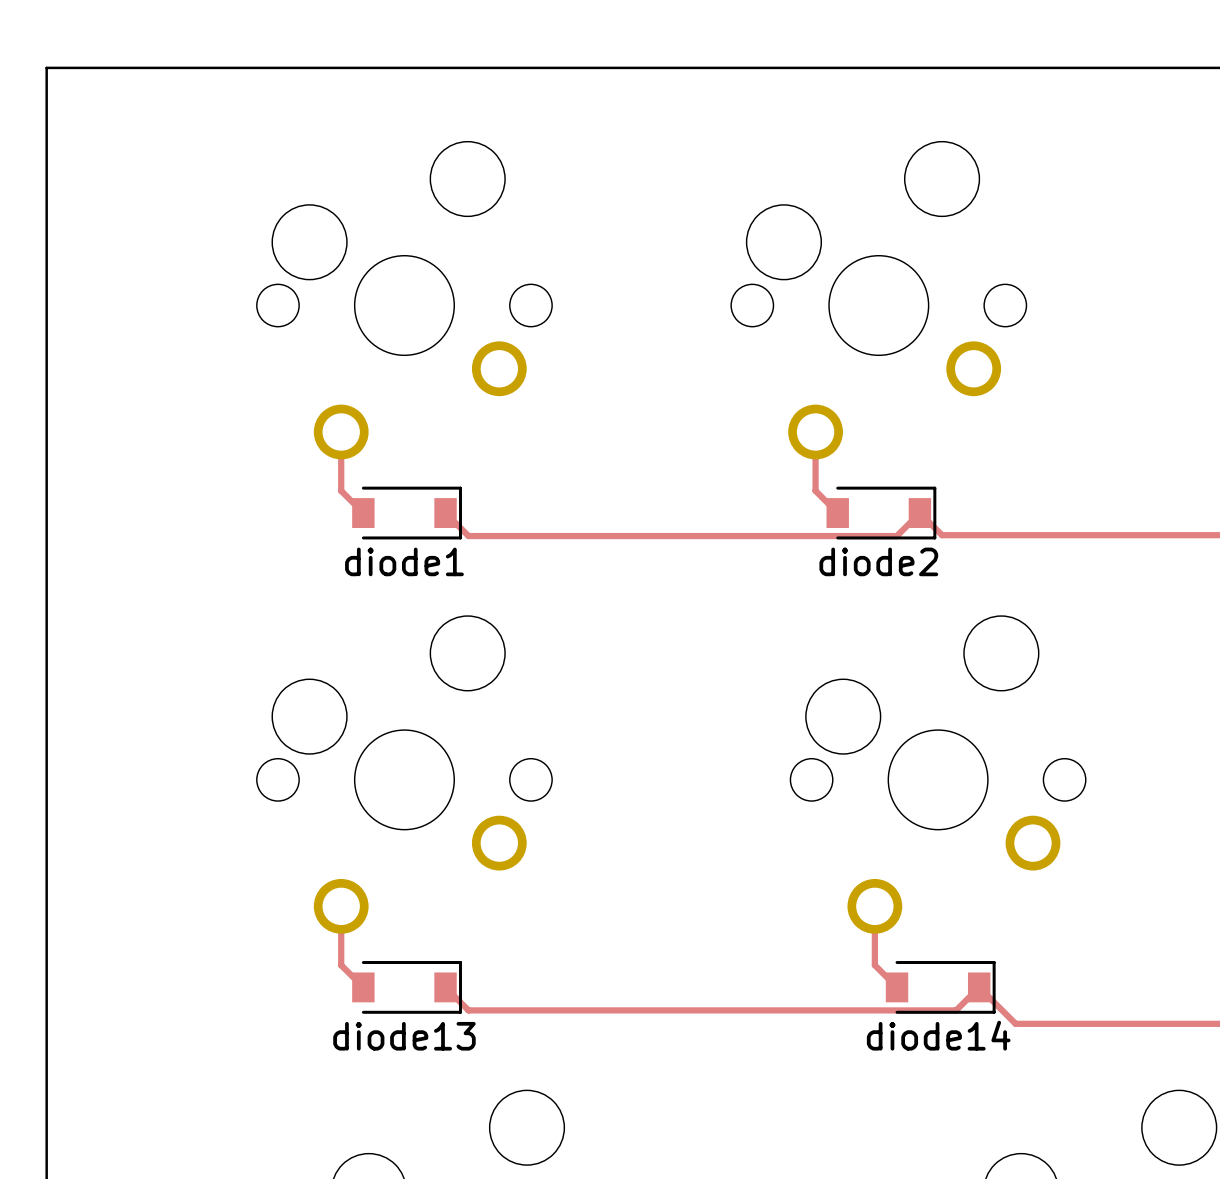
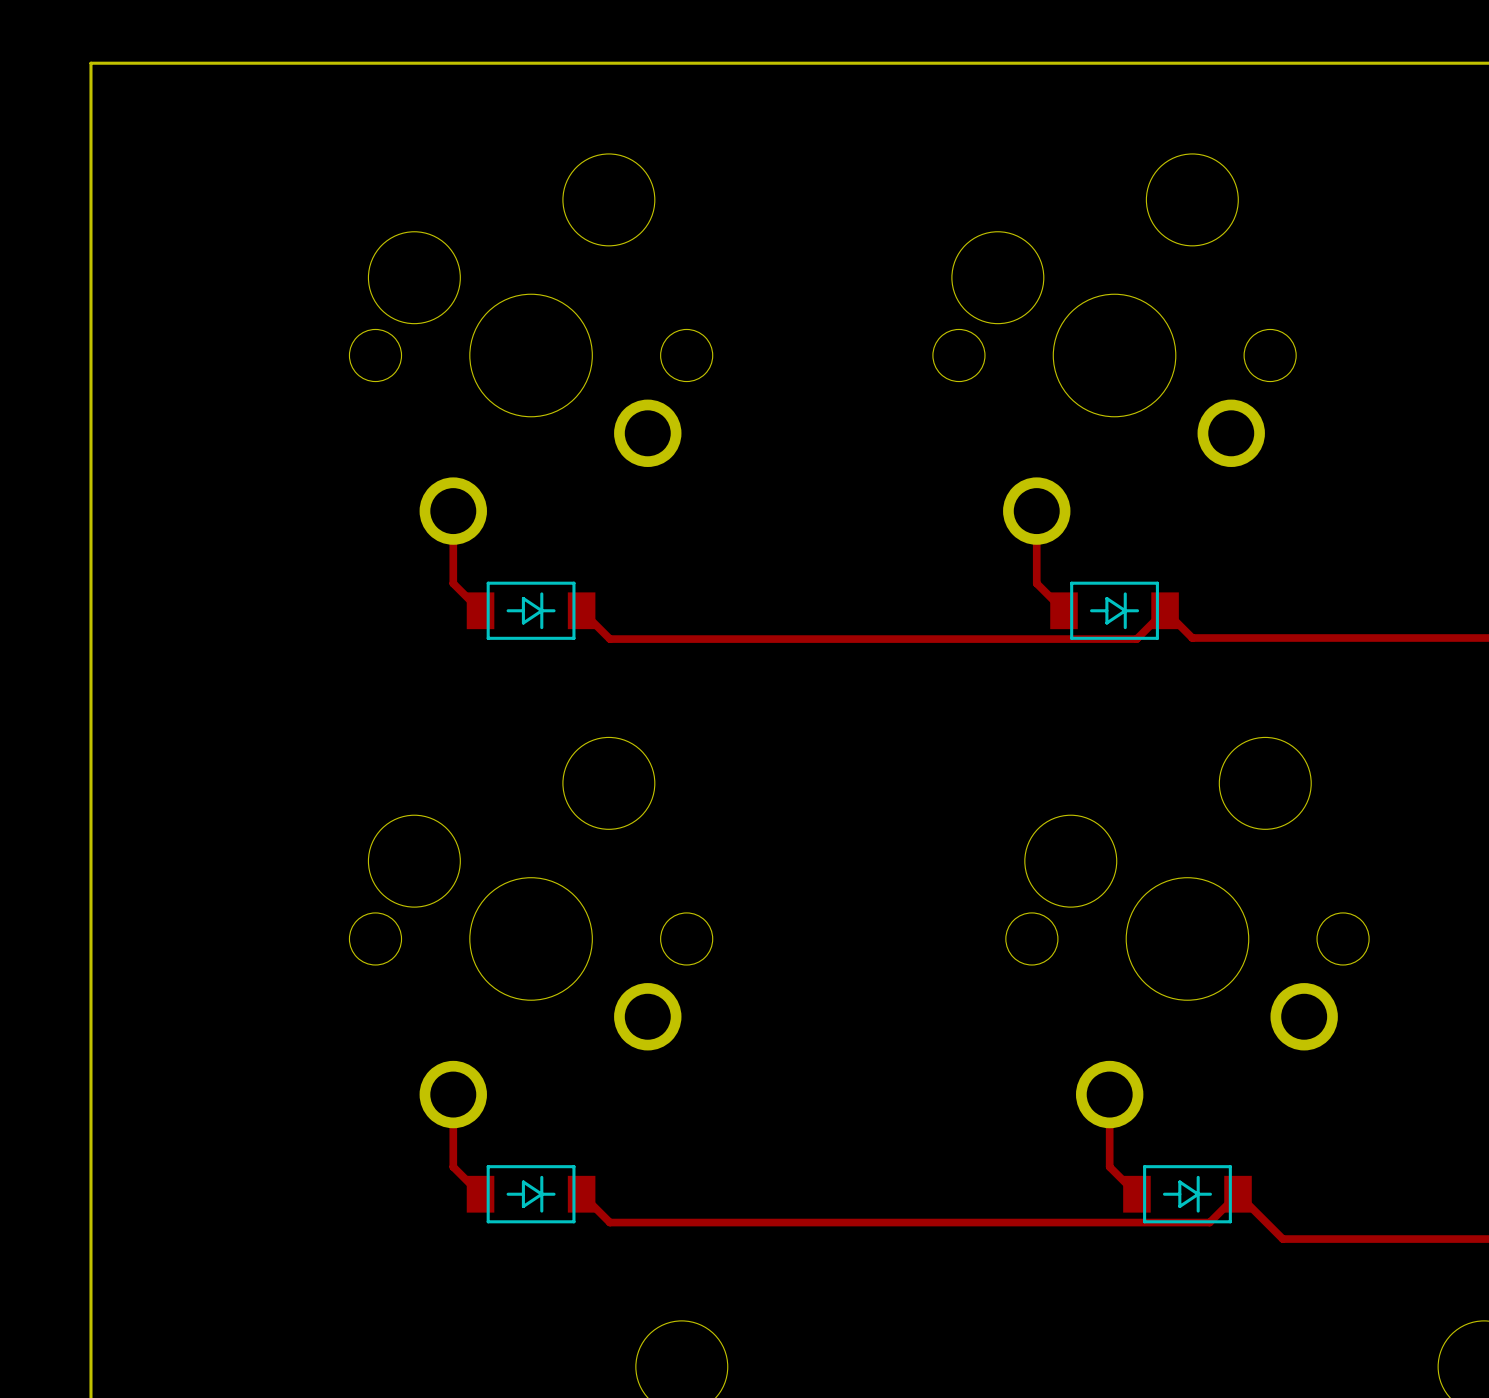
part: none -> (531, 610)
diode1: (407, 513) -> none
part: none -> (1114, 610)
diode2: (881, 513) -> none
part: none -> (531, 1194)
diode13: (407, 987) -> none
part: none -> (1187, 1194)
diode14: (940, 987) -> none

